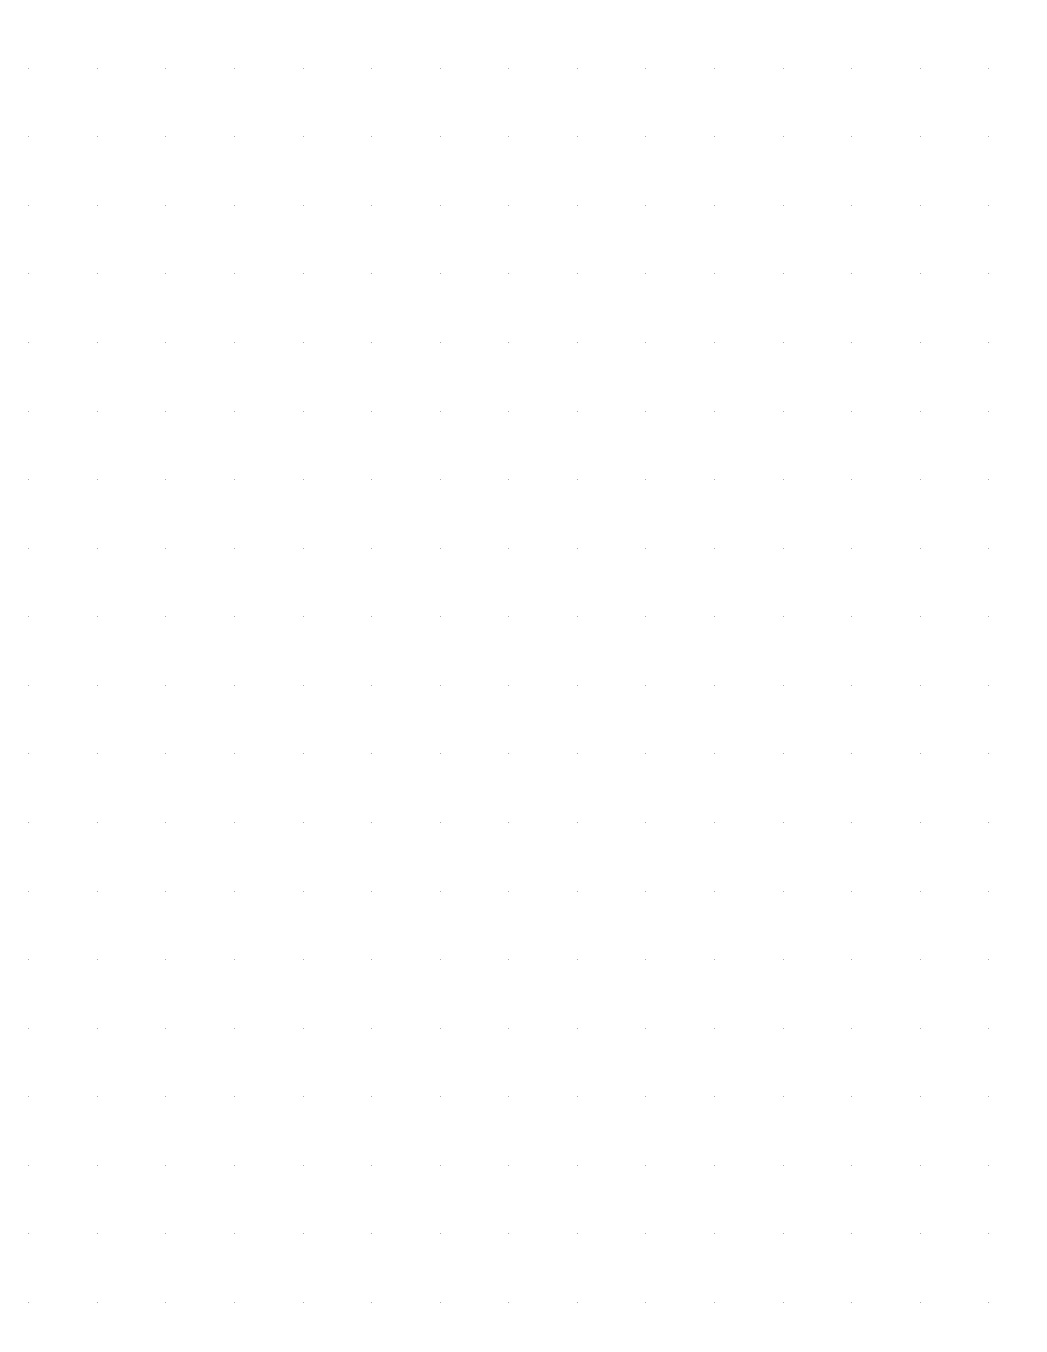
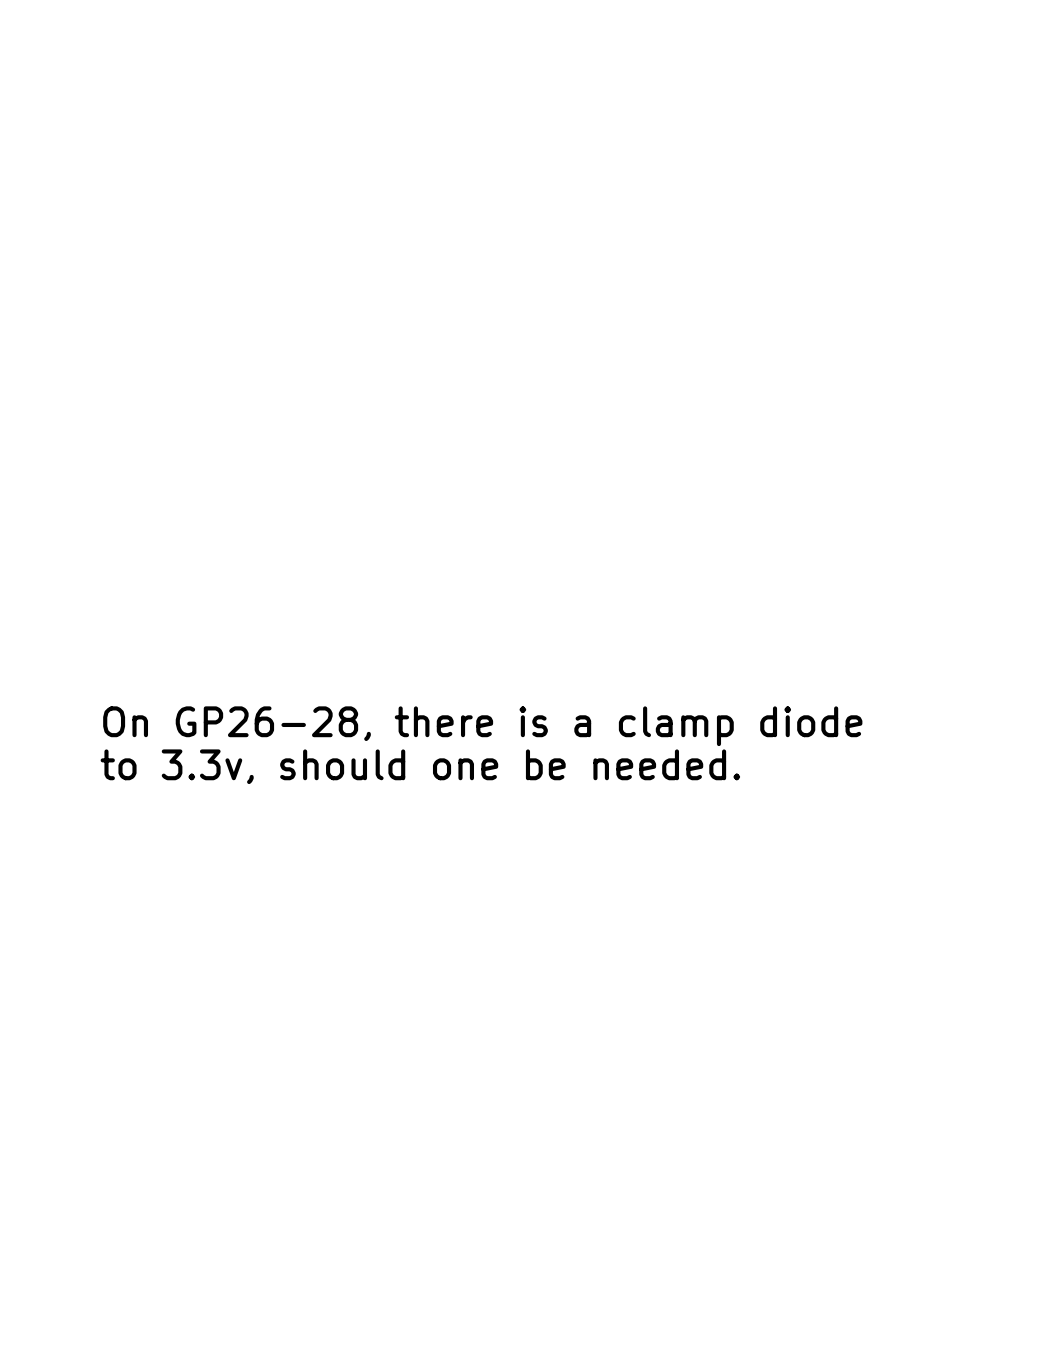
text: none -> On GP26-28, there is a clamp diode (482, 726)
text: none -> to 3.3v, should one be needed. (420, 766)

